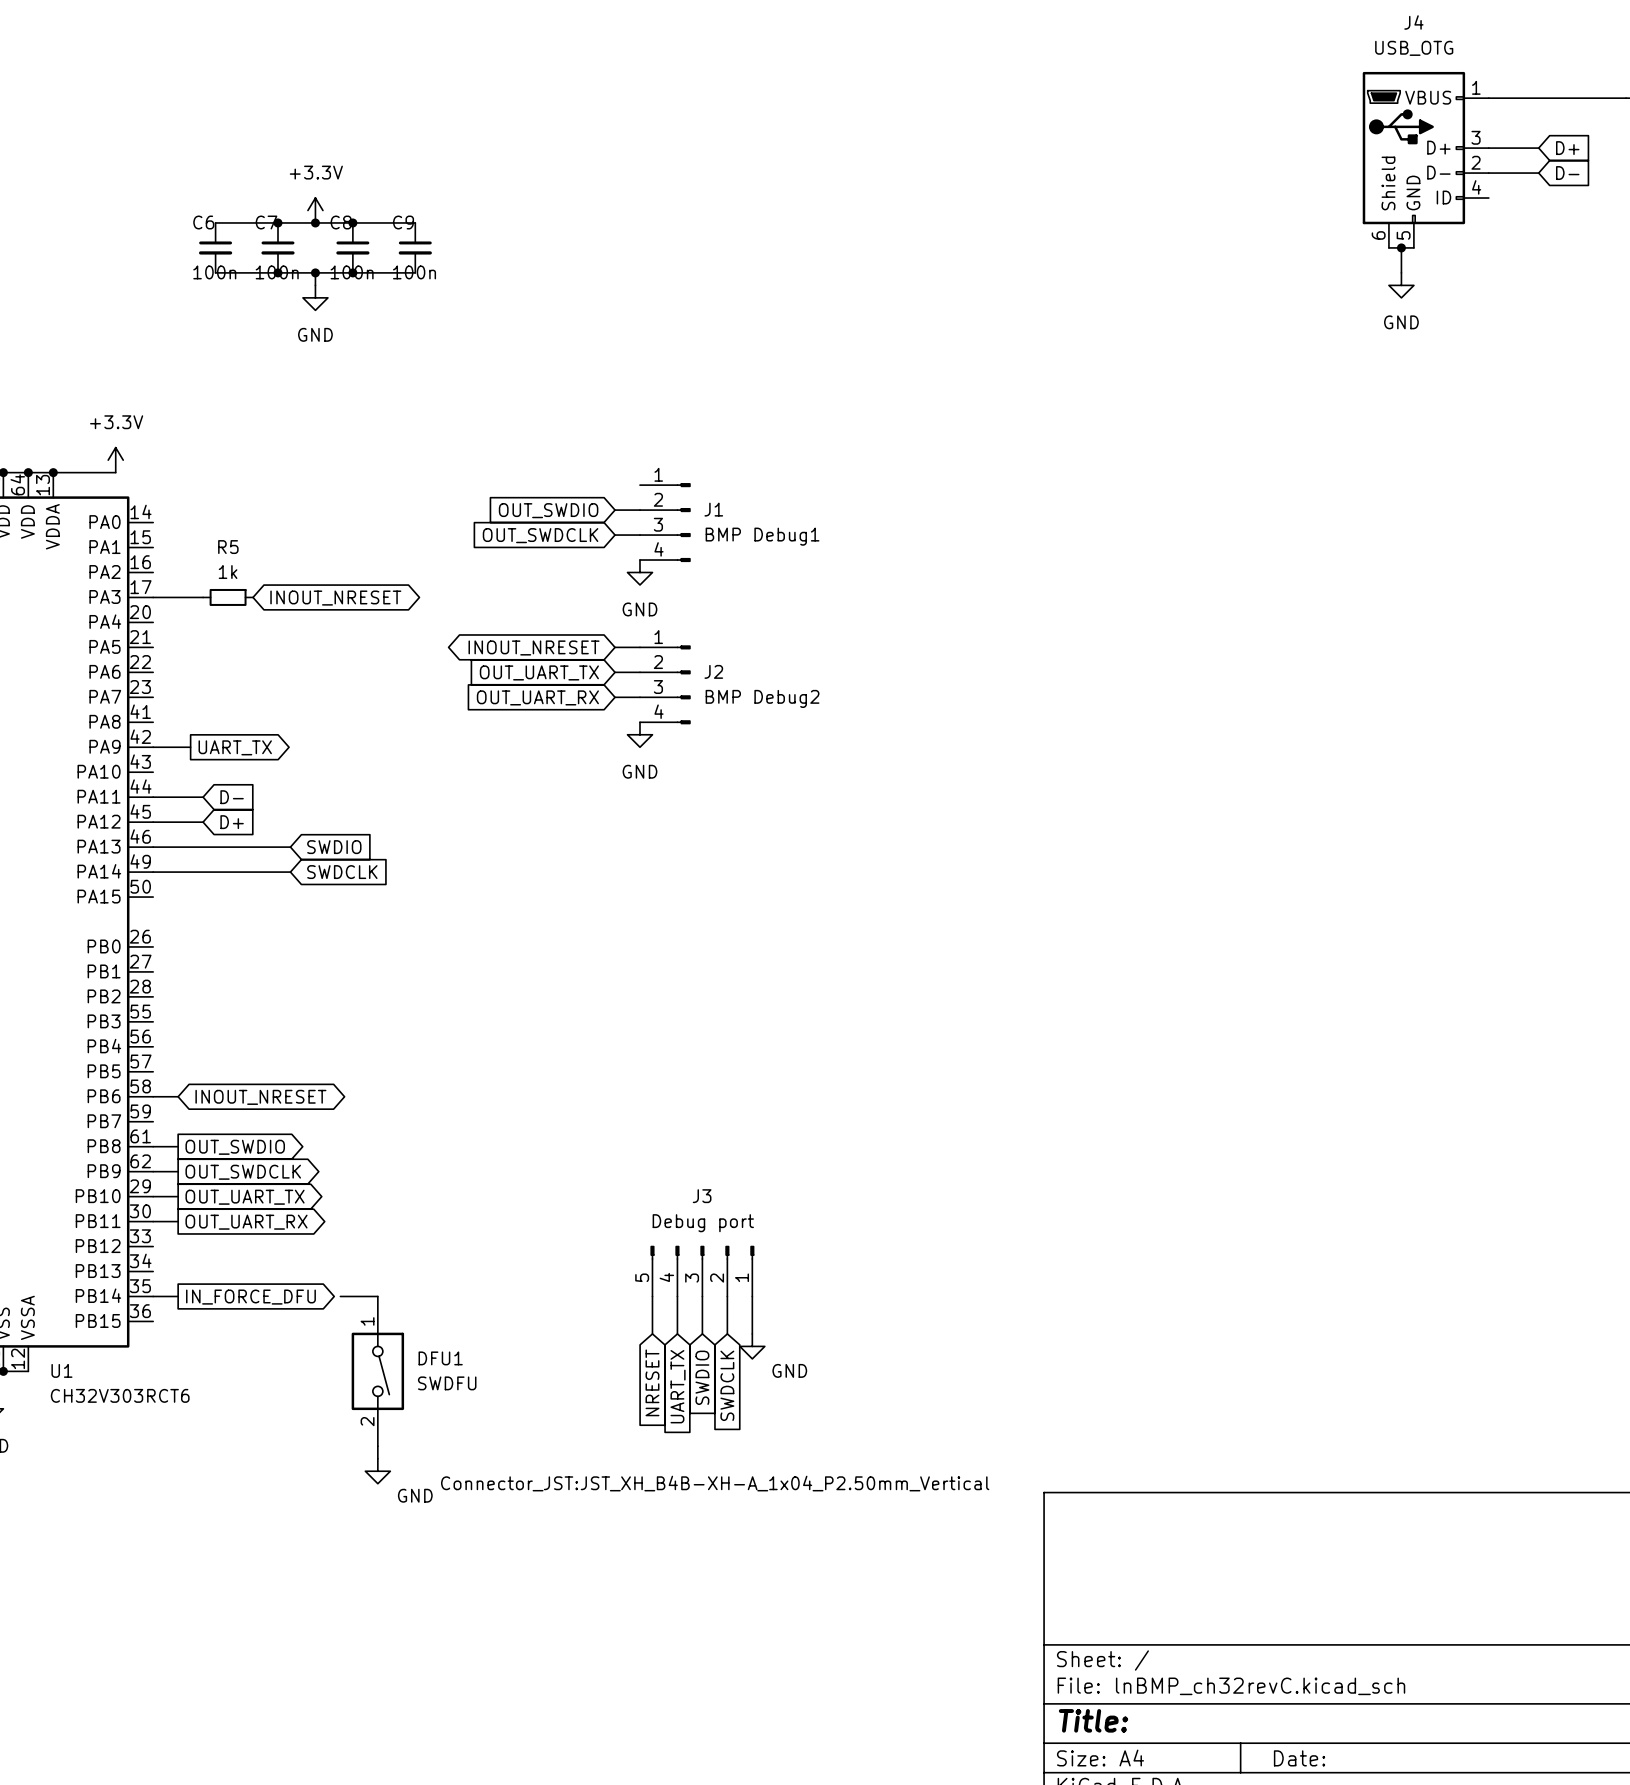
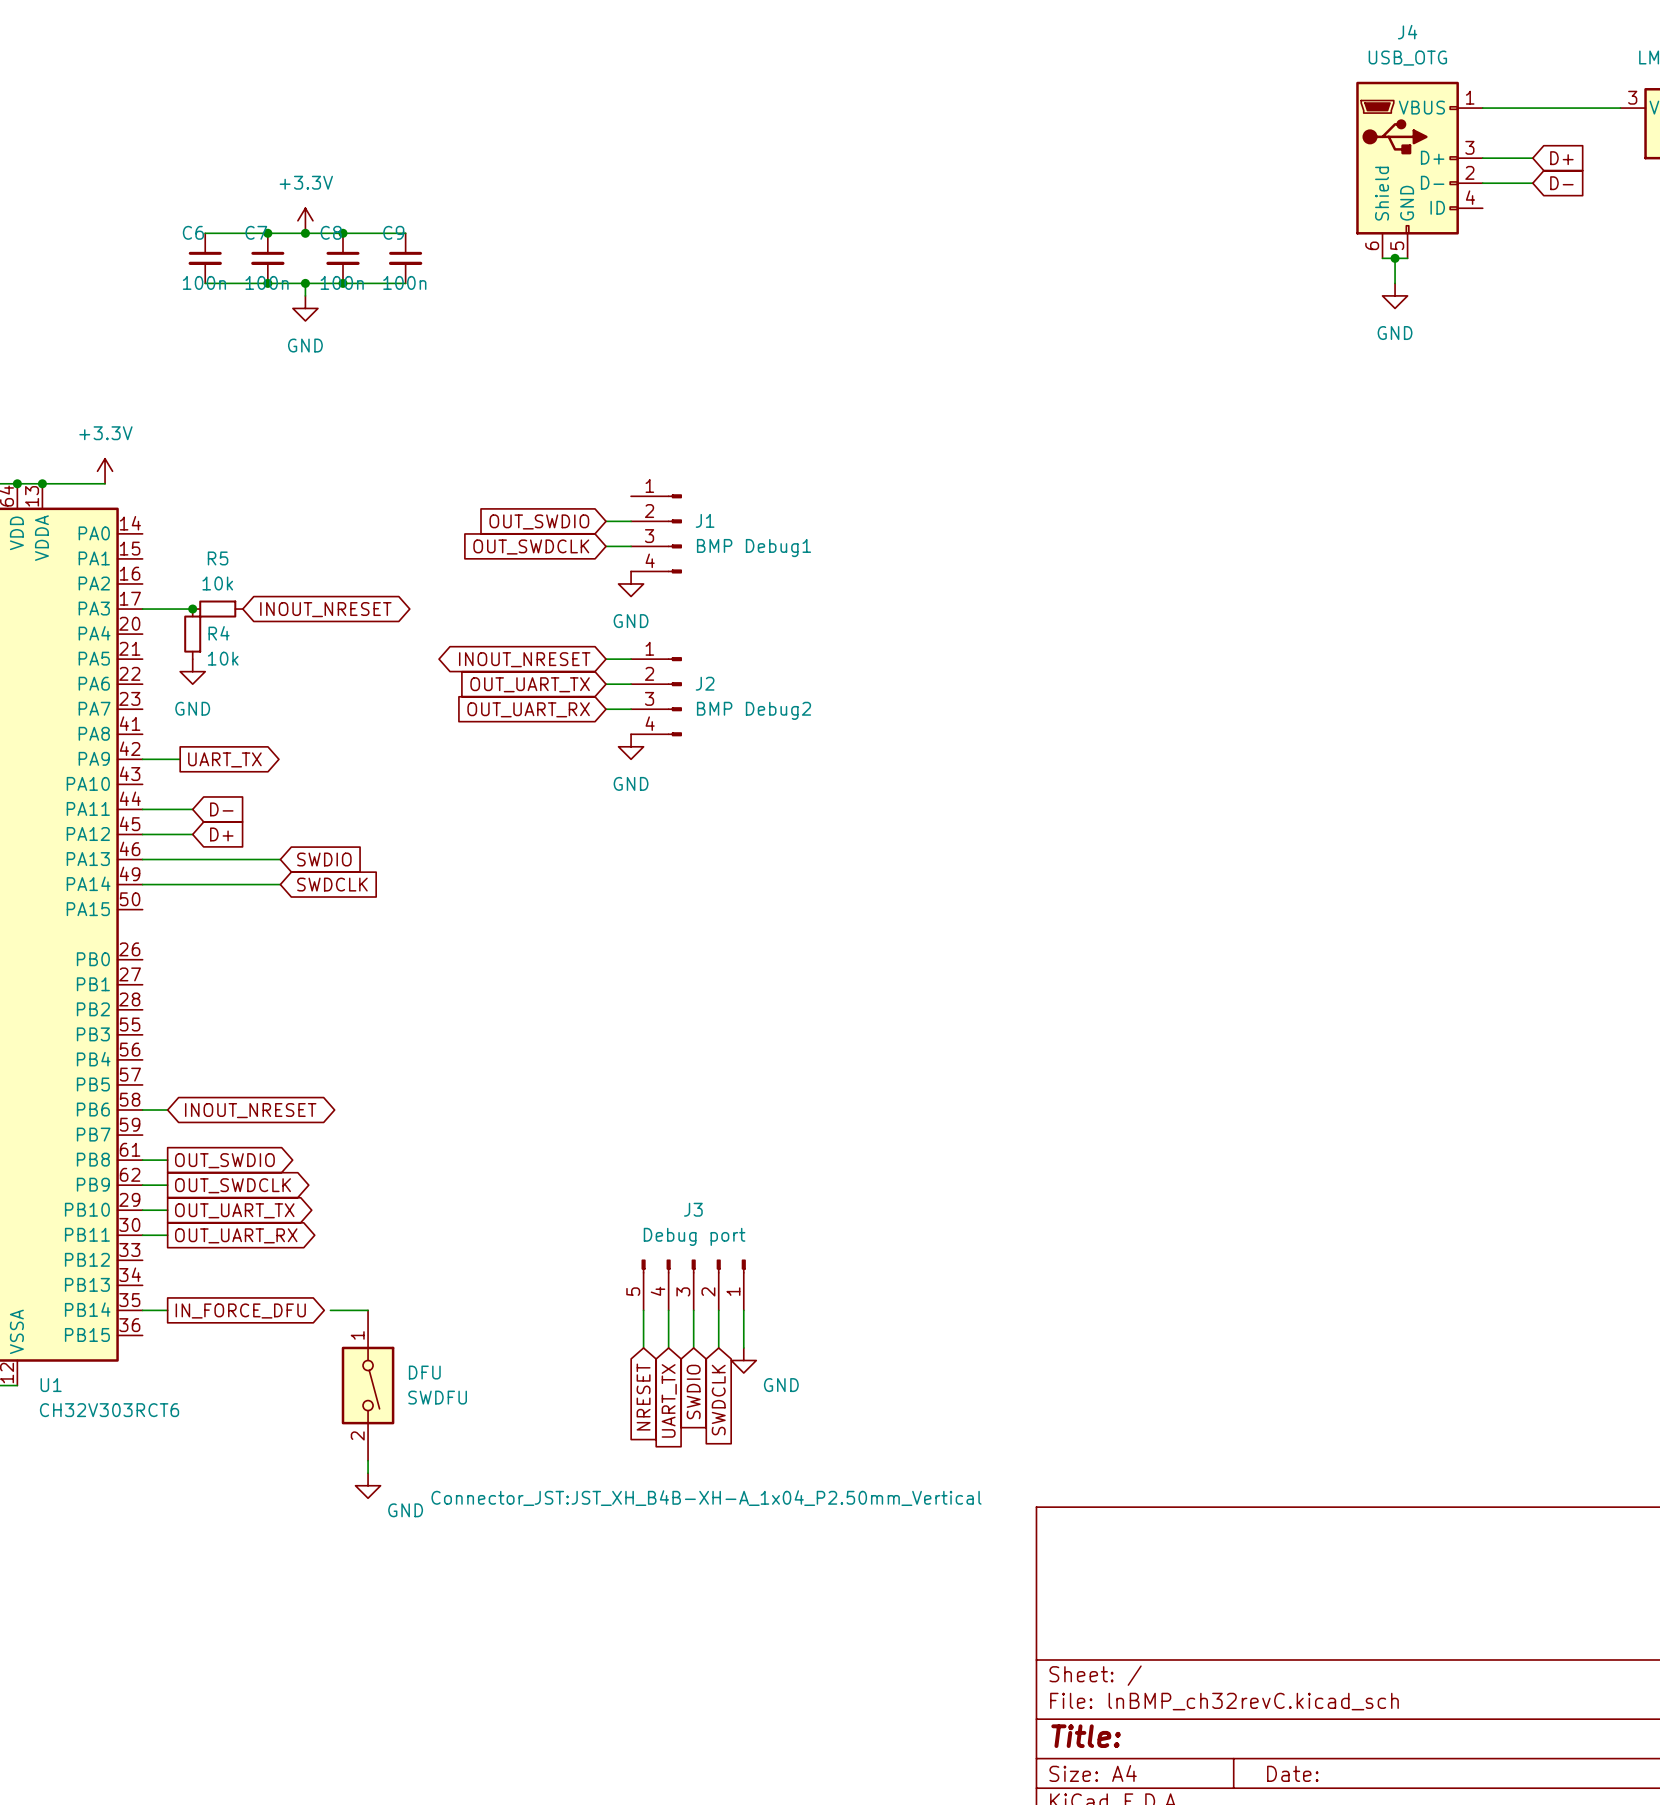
R5 value: 1k (228, 572) -> 10k (217, 583)
junction: none -> (192, 609)
R4: none -> 10k (192, 634)
power symbol: none -> GND (192, 671)
DFU1 name: DFU1 (440, 1358) -> DFU (424, 1372)

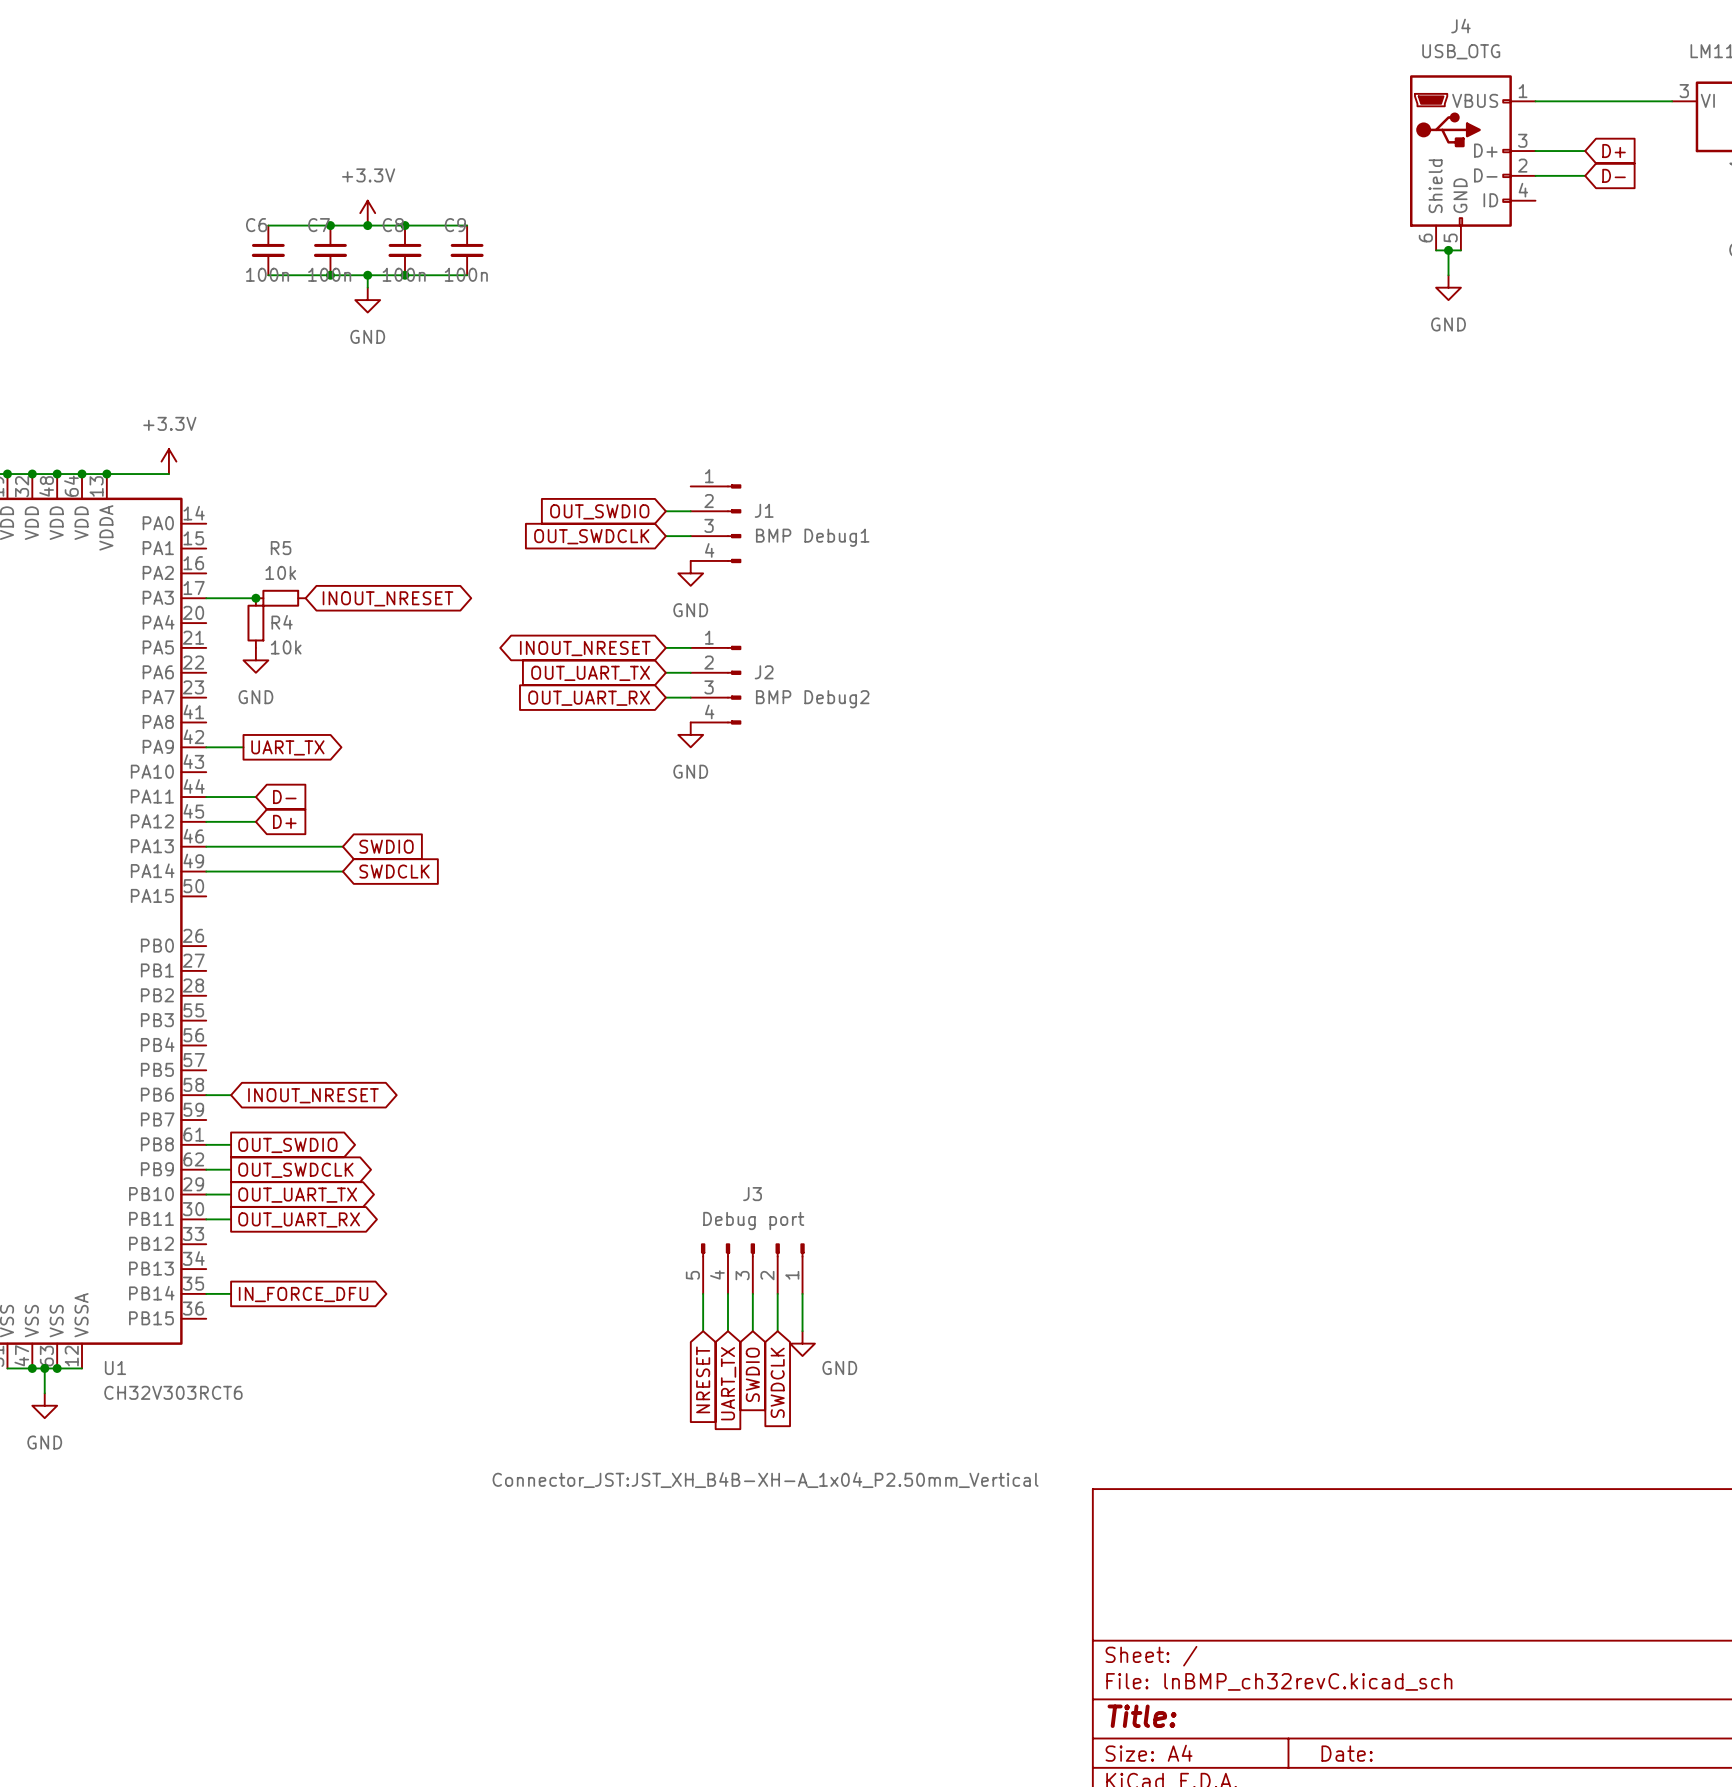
wire: (330, 1310) (368, 1310) -> none
DFU: SWDFU (368, 1385) -> none
wire: (368, 1460) (368, 1473) -> none
power symbol: GND (368, 1485) -> none

